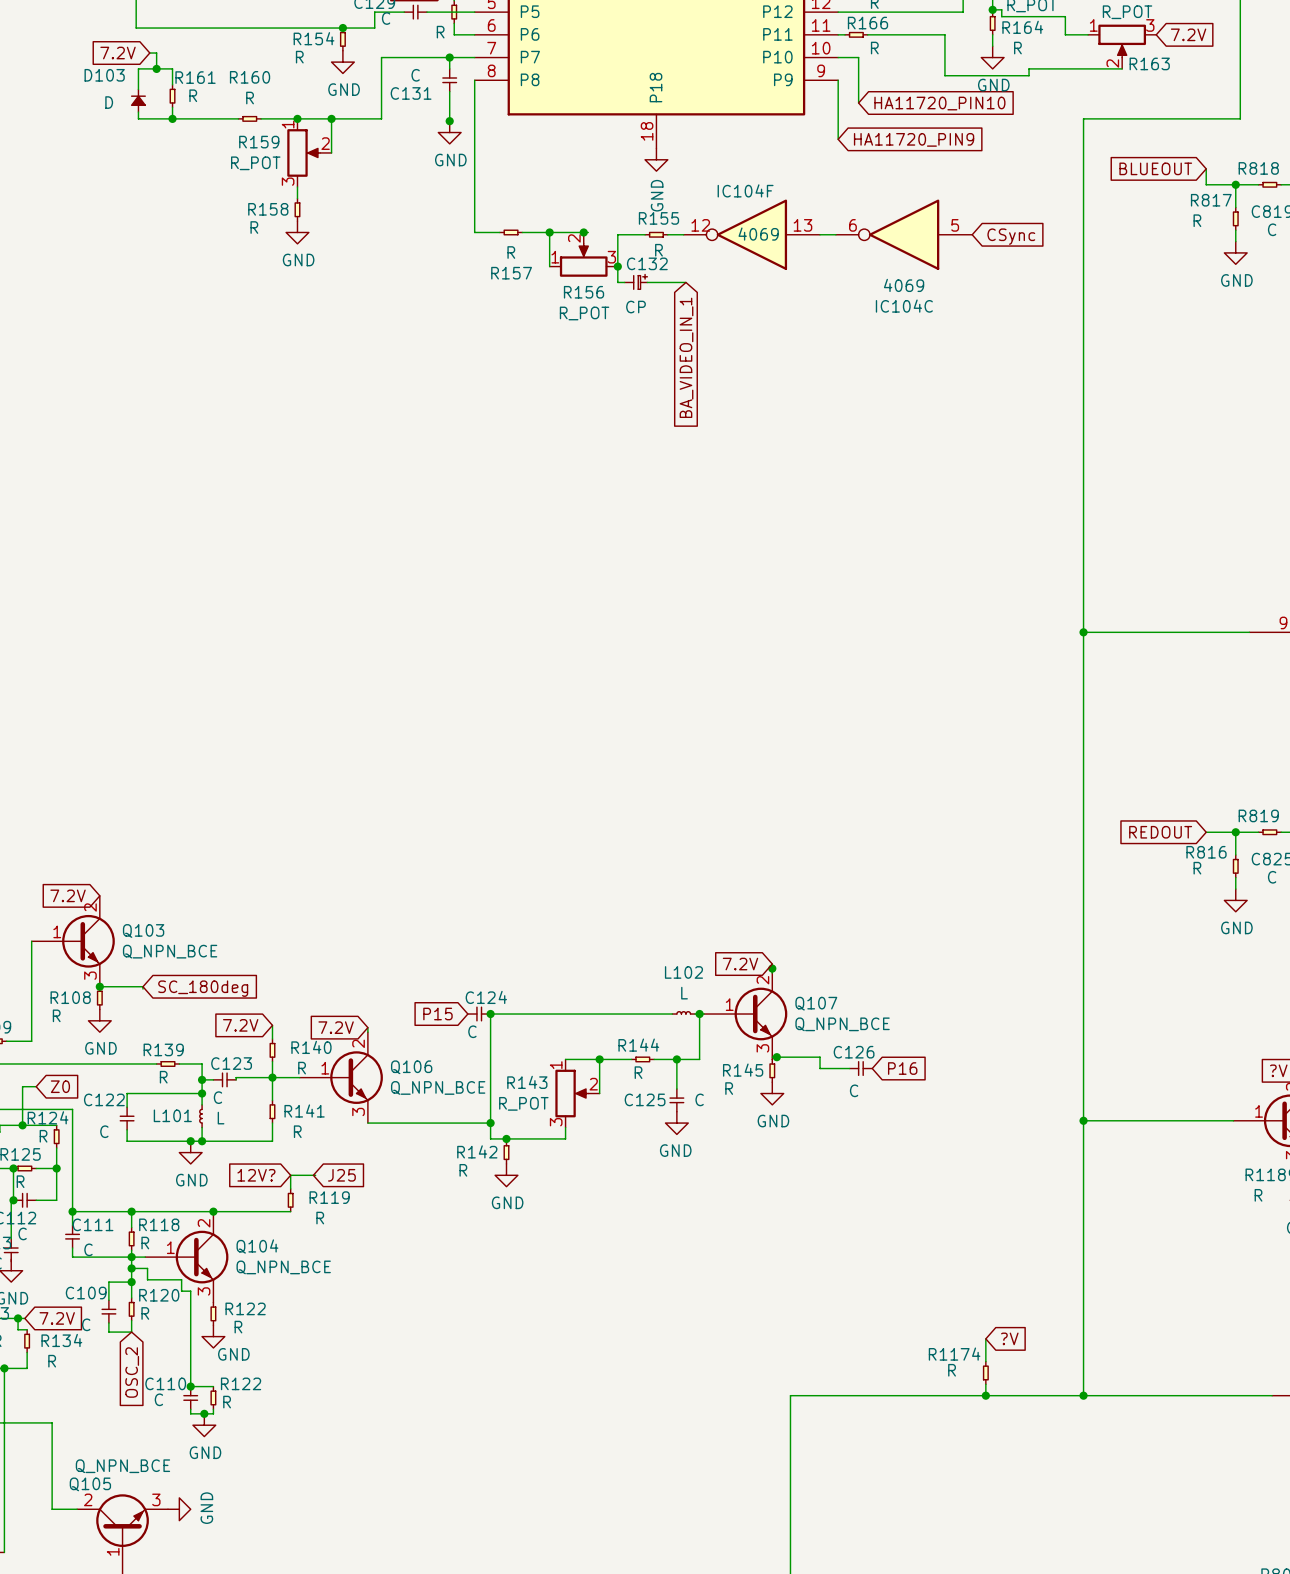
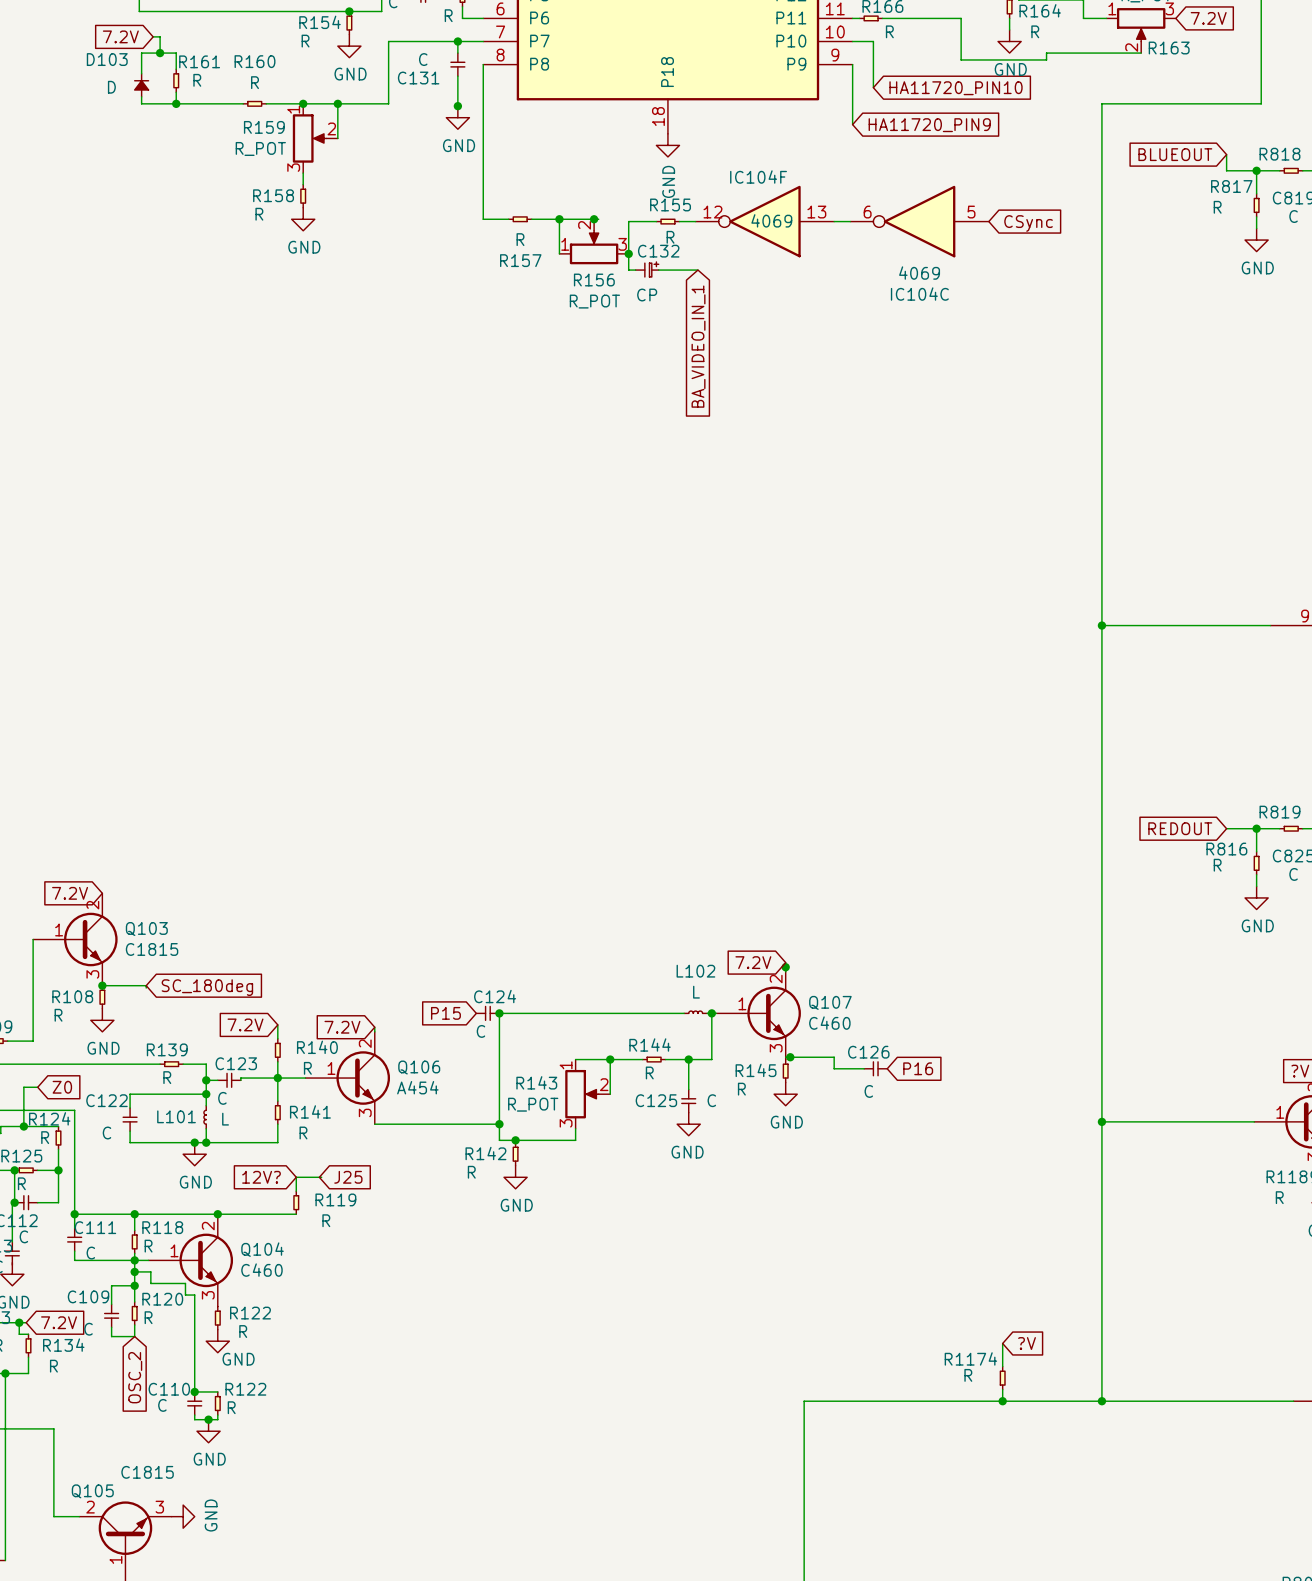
Q103 value: Q_NPN_BCE (170, 951) -> C1815 (152, 949)
Q107 value: Q_NPN_BCE (842, 1024) -> C460 (829, 1023)
Q106 value: Q_NPN_BCE (438, 1087) -> A454 (417, 1087)
Q104 value: Q_NPN_BCE (283, 1267) -> C460 (261, 1270)
Q105 value: Q_NPN_BCE (122, 1466) -> C1815 (147, 1472)

